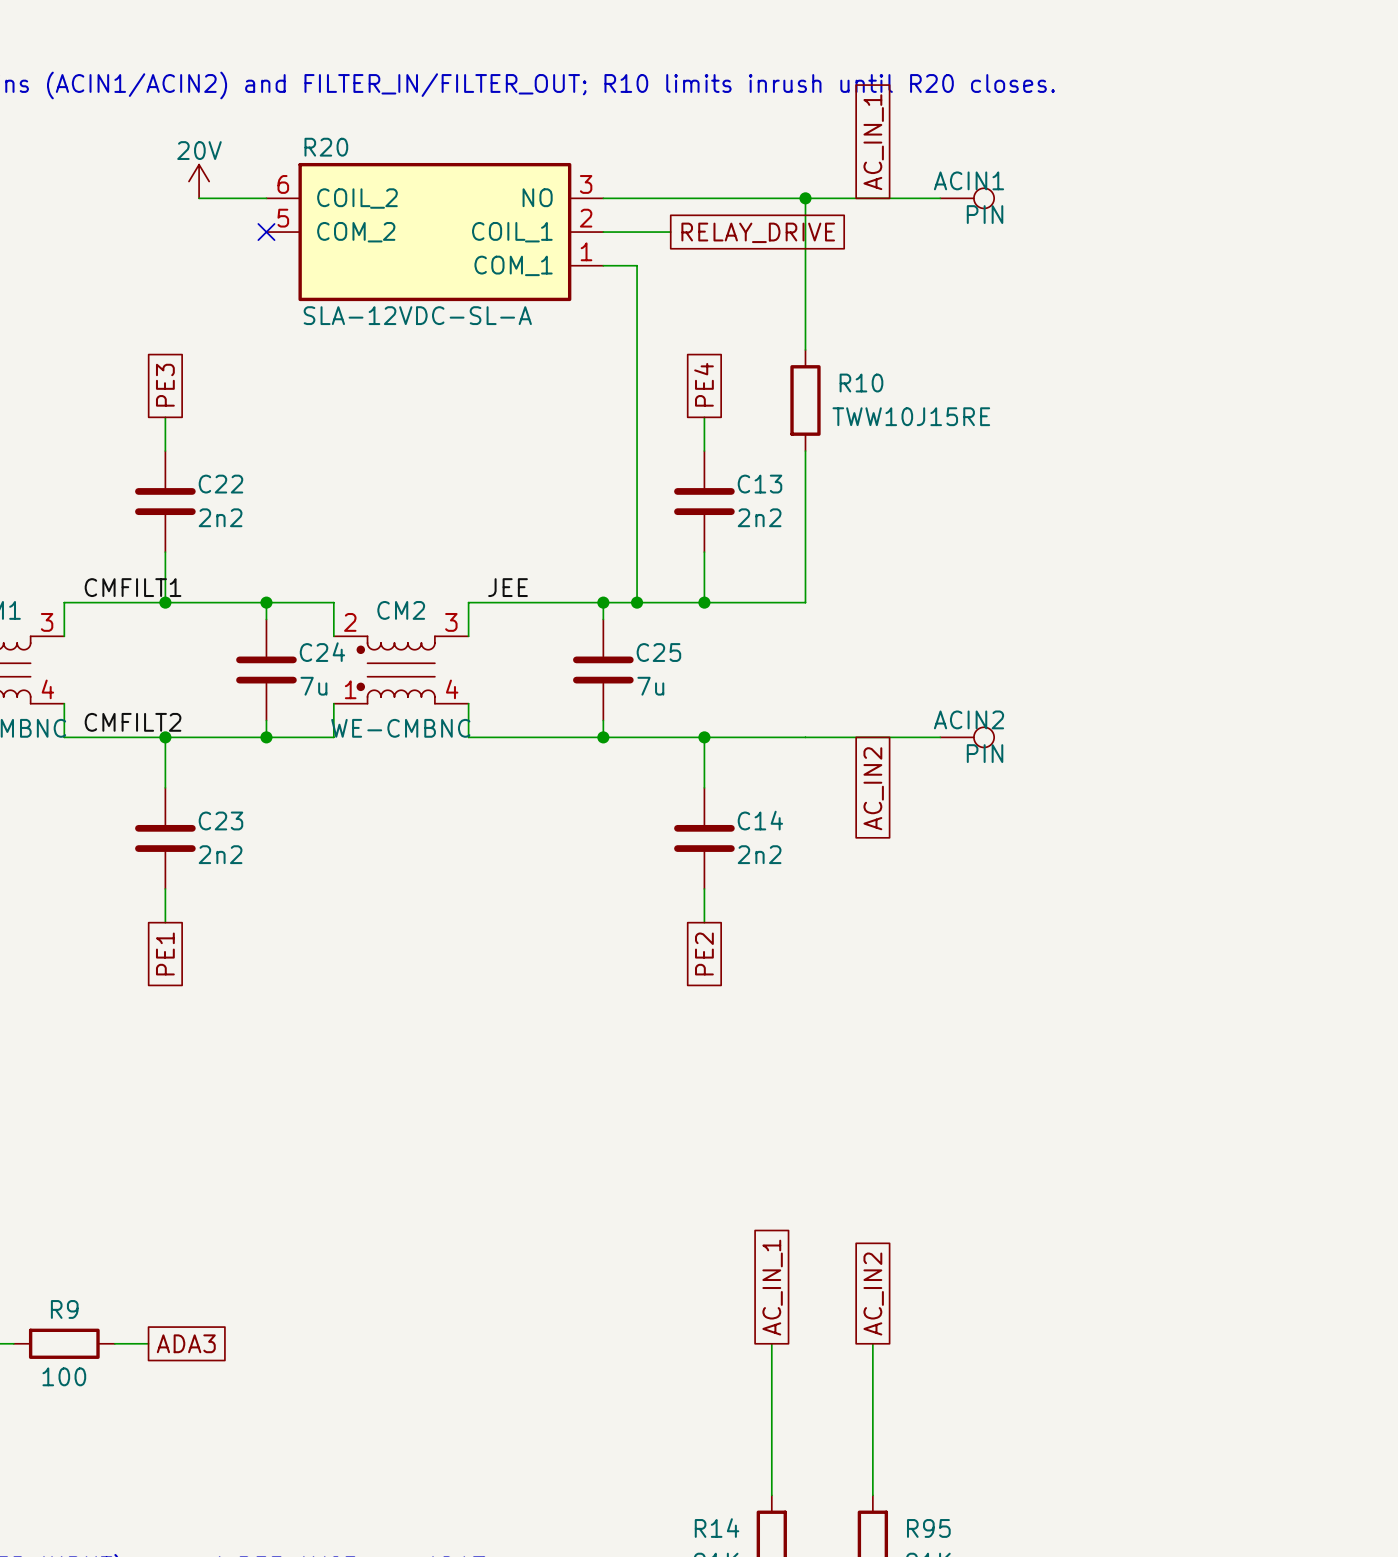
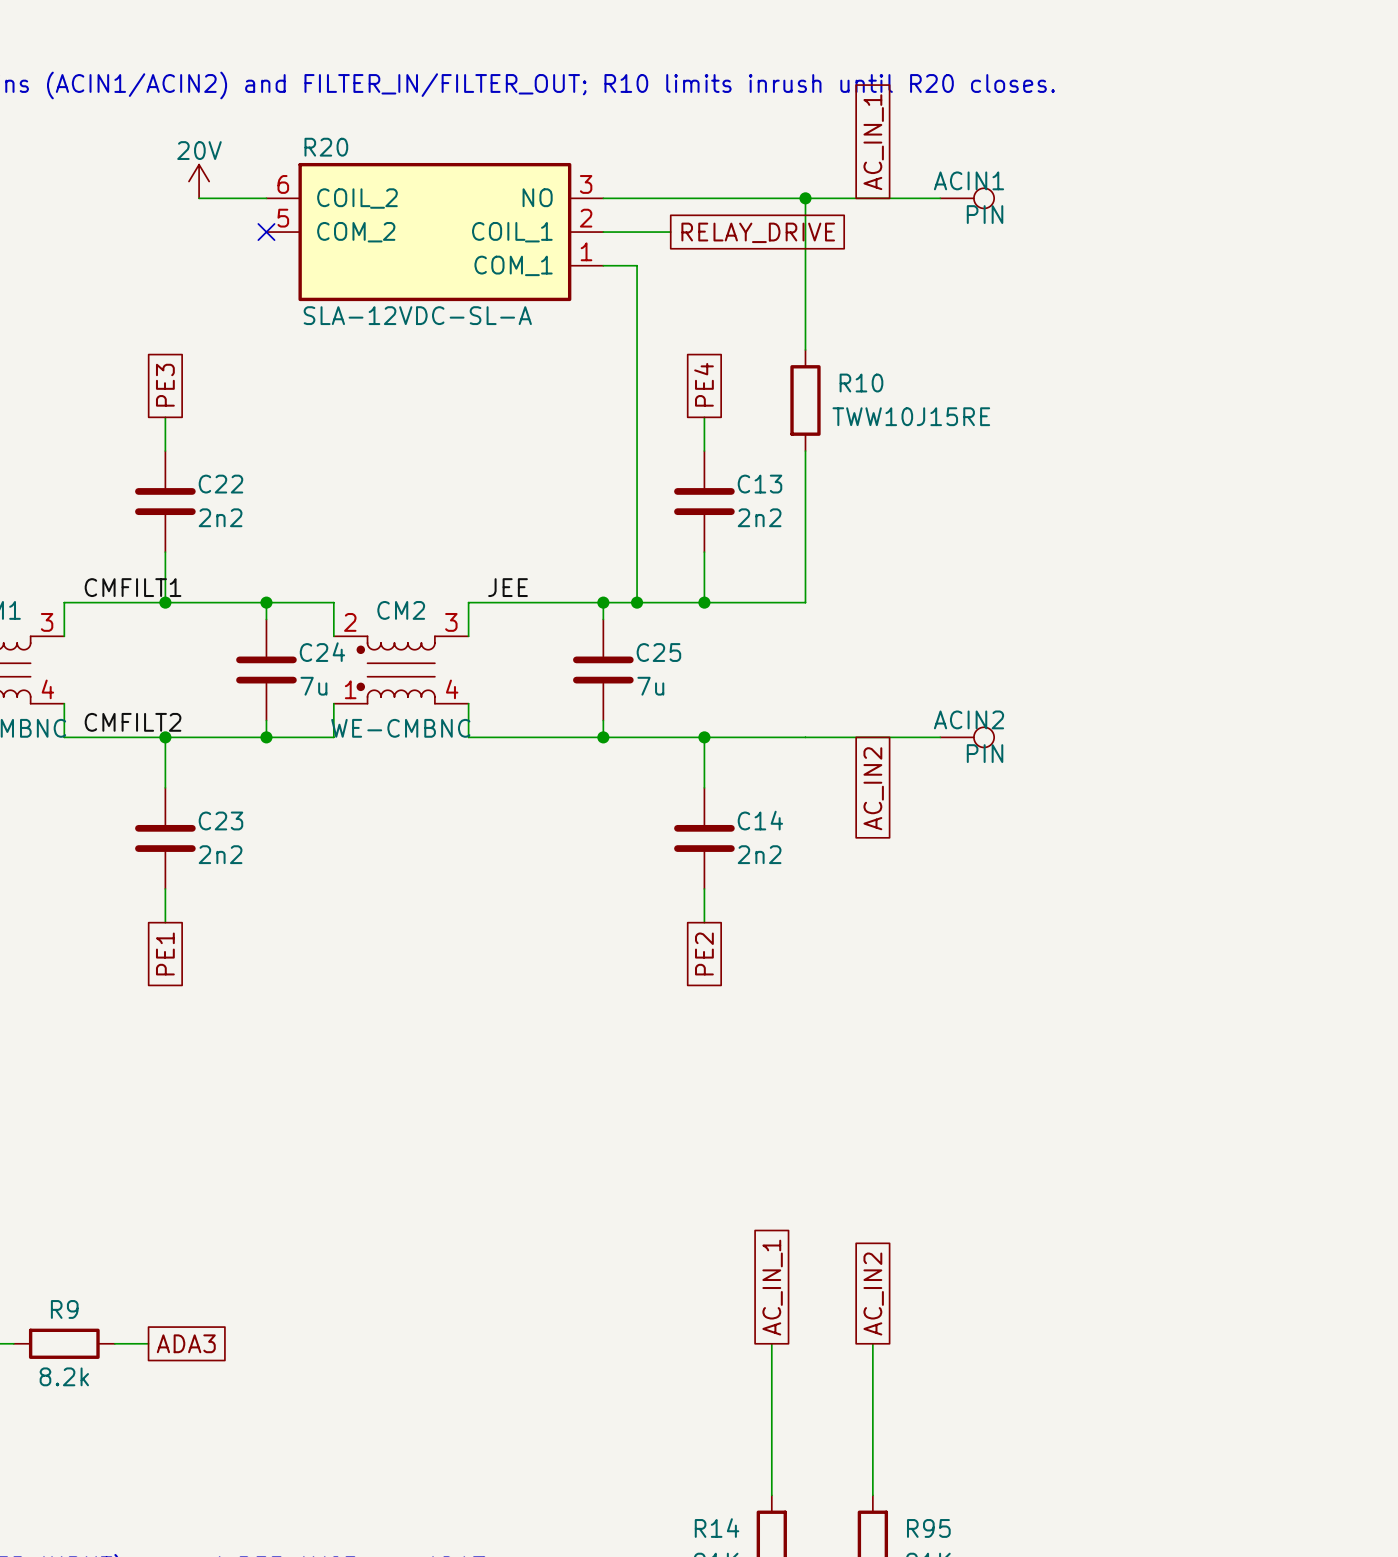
R9 value: 100 (64, 1376) -> 8.2k (64, 1376)

